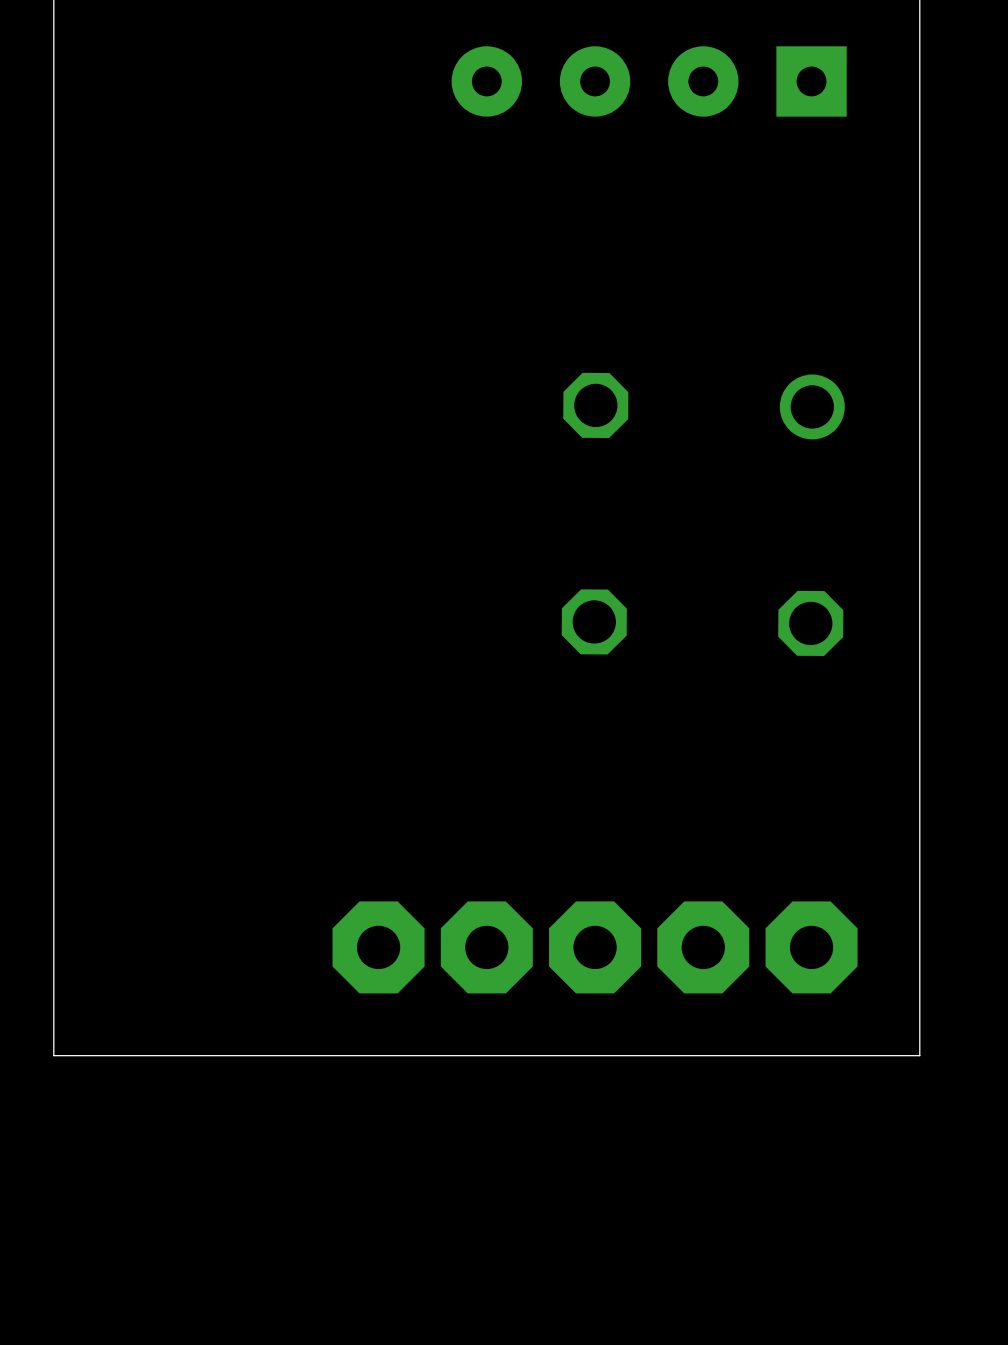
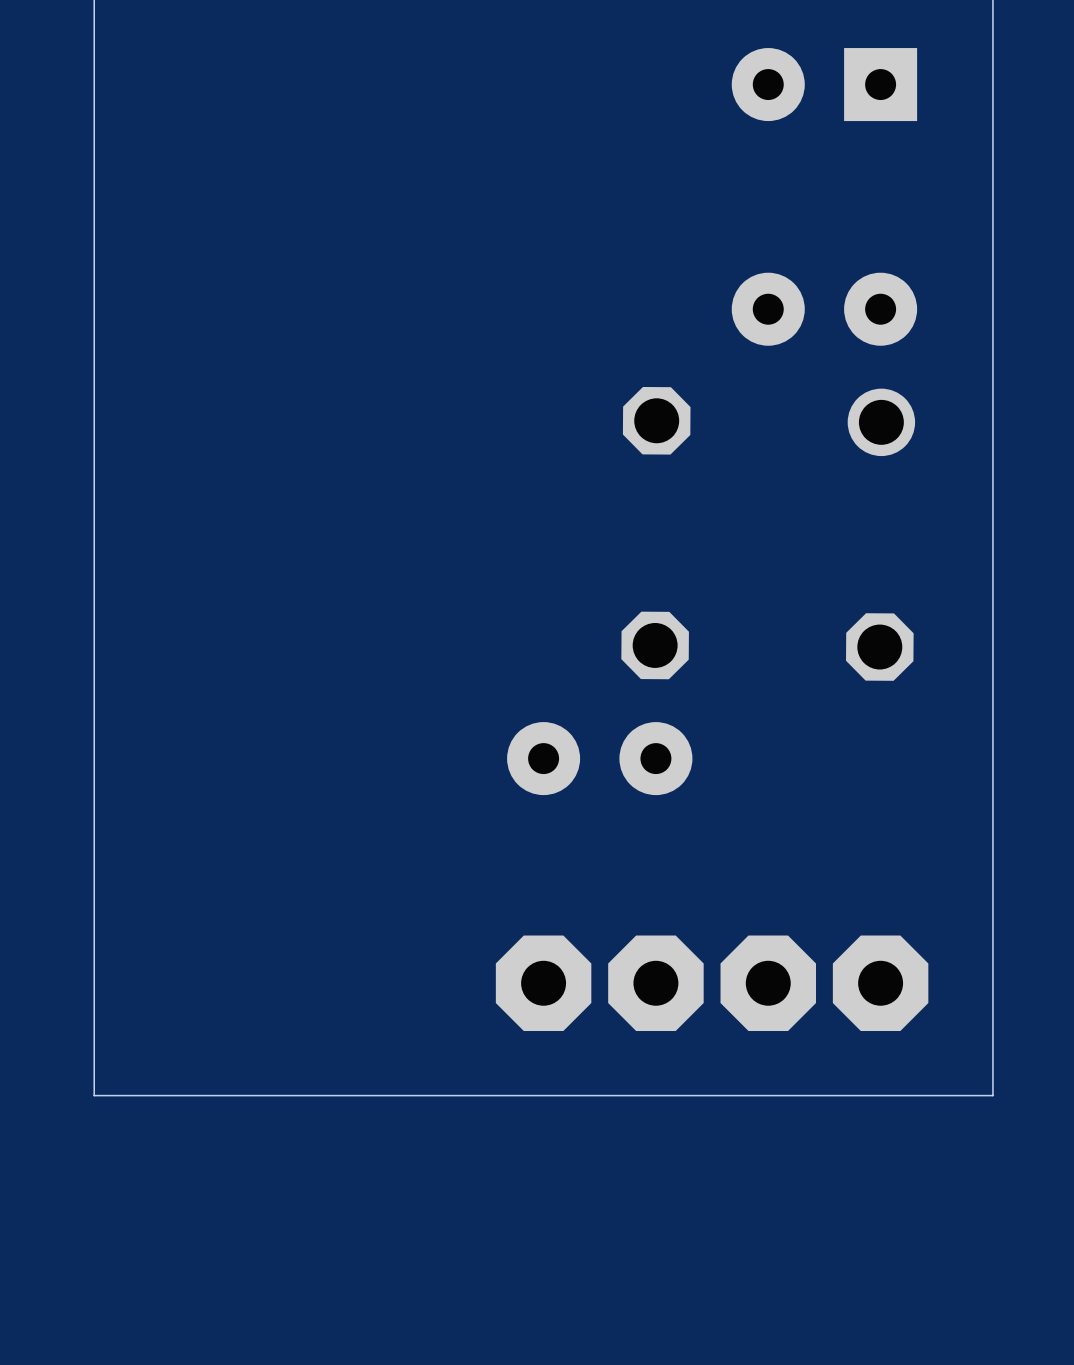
part position: (540, 81) -> (824, 309)
part: none -> (599, 758)
part: (378, 947) -> none

